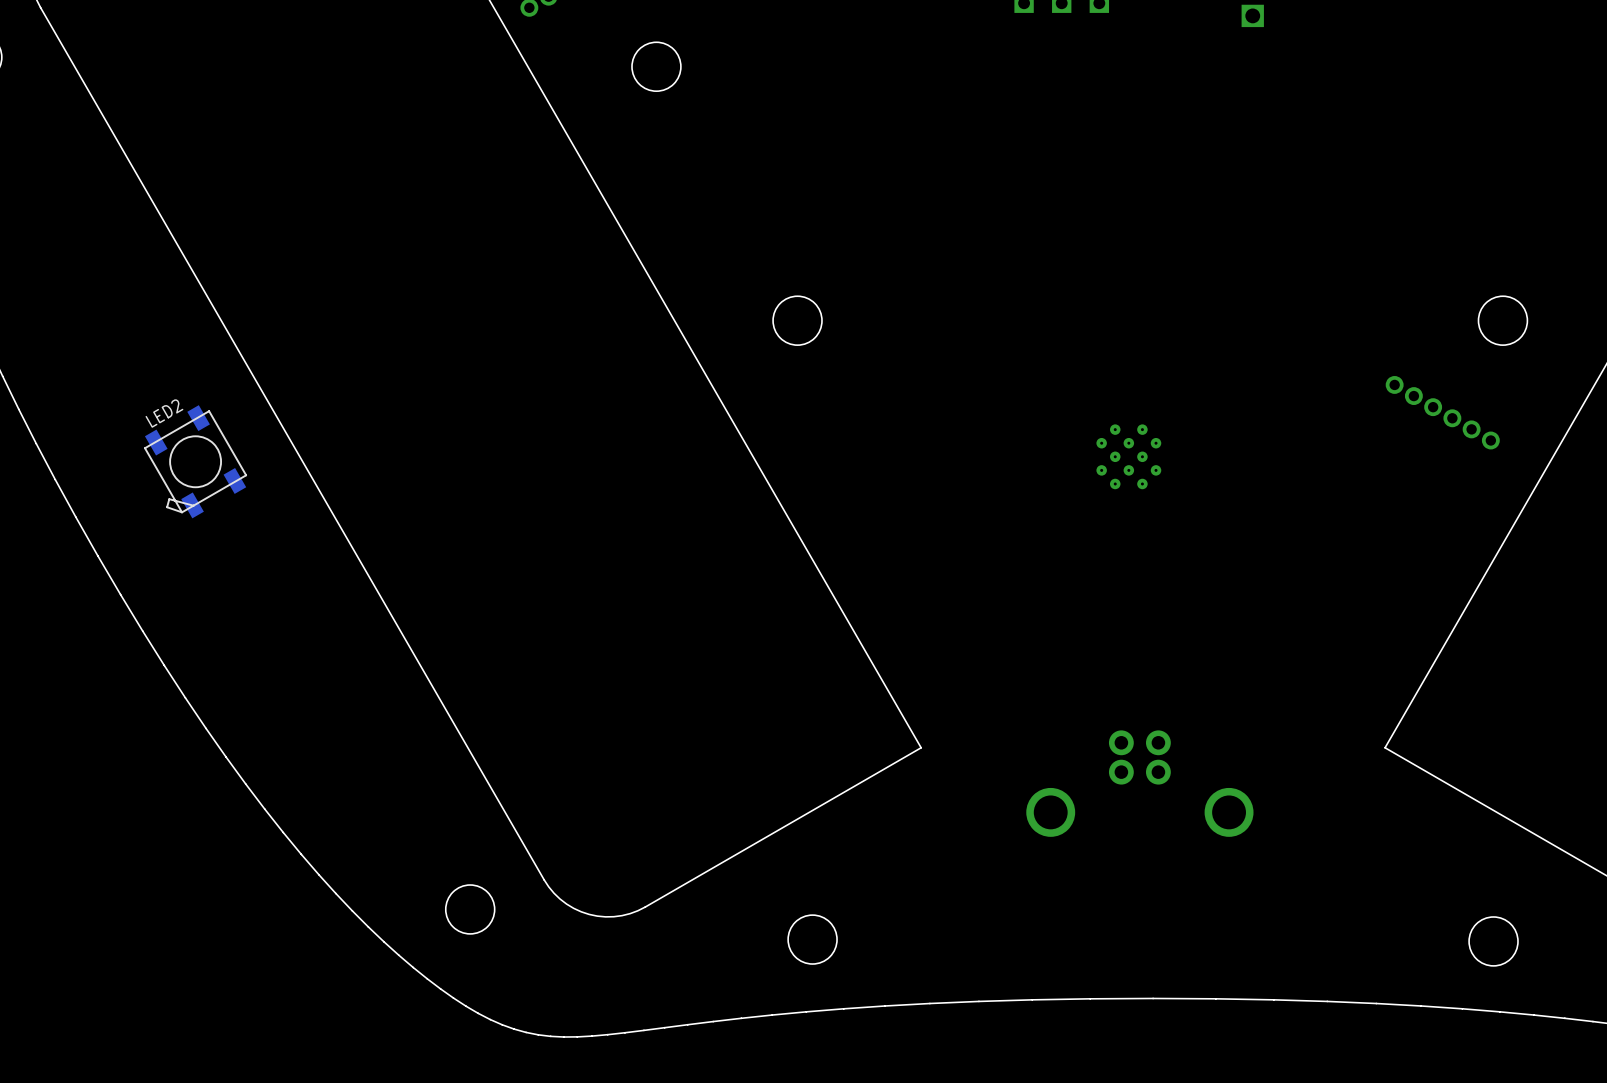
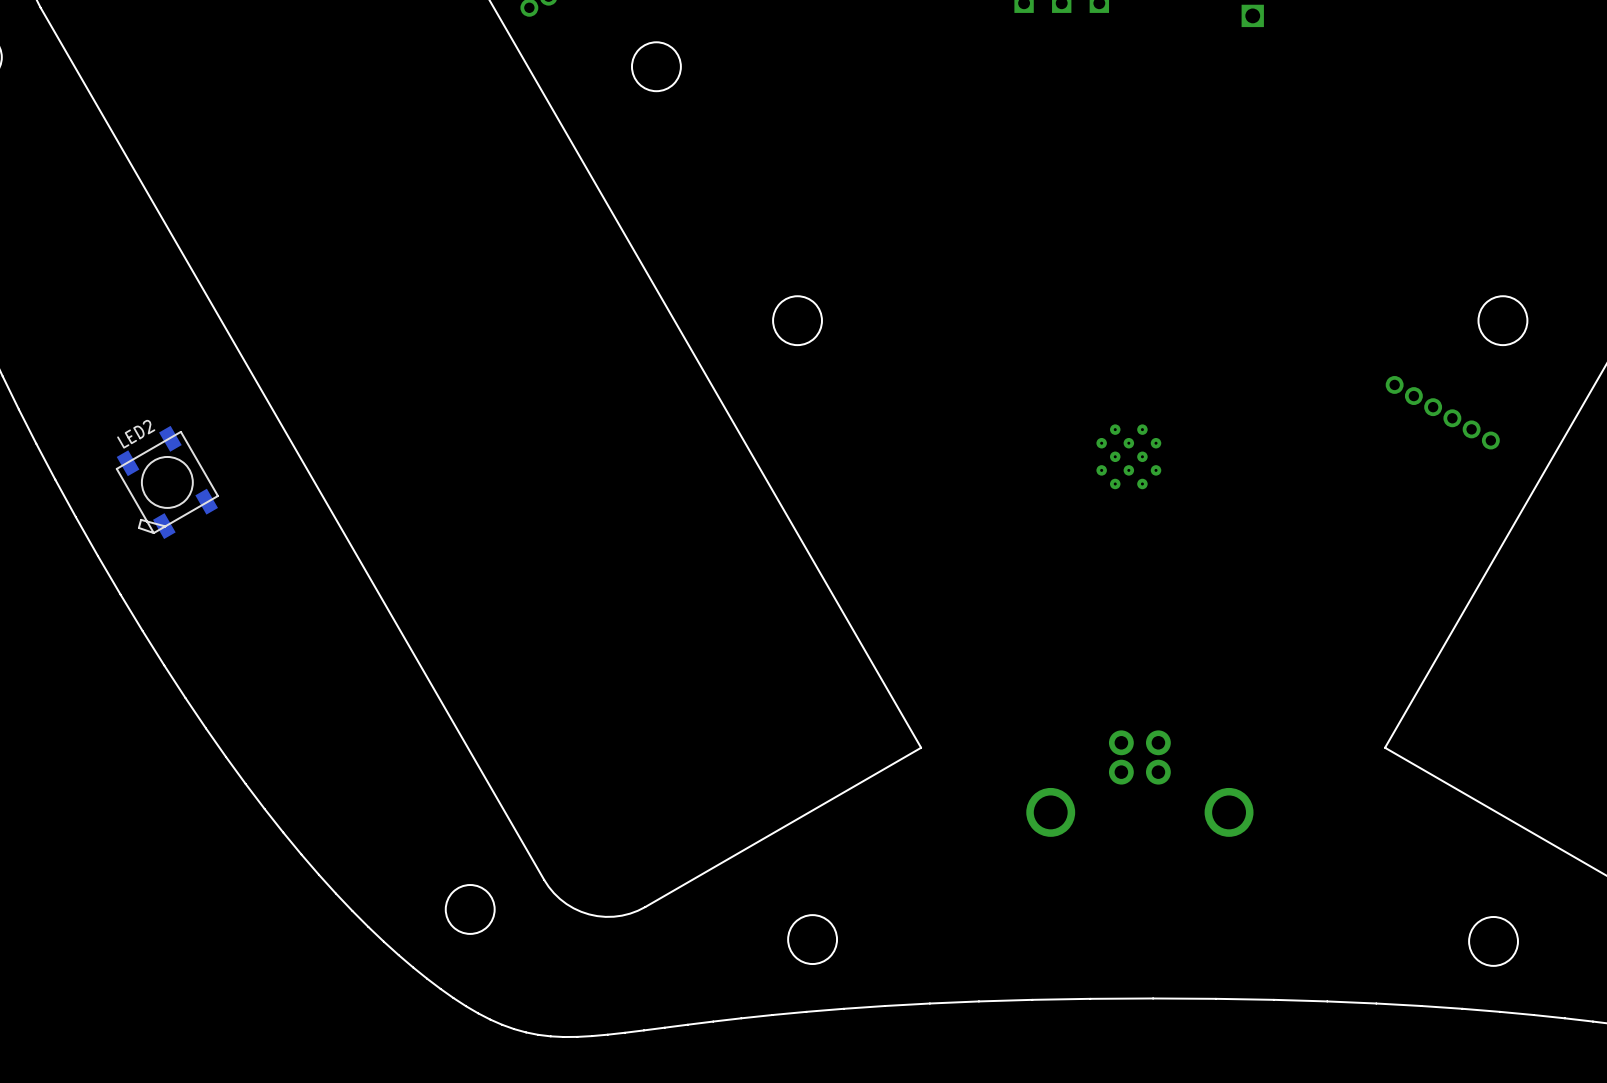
LED2 position: (195, 461) -> (167, 482)

